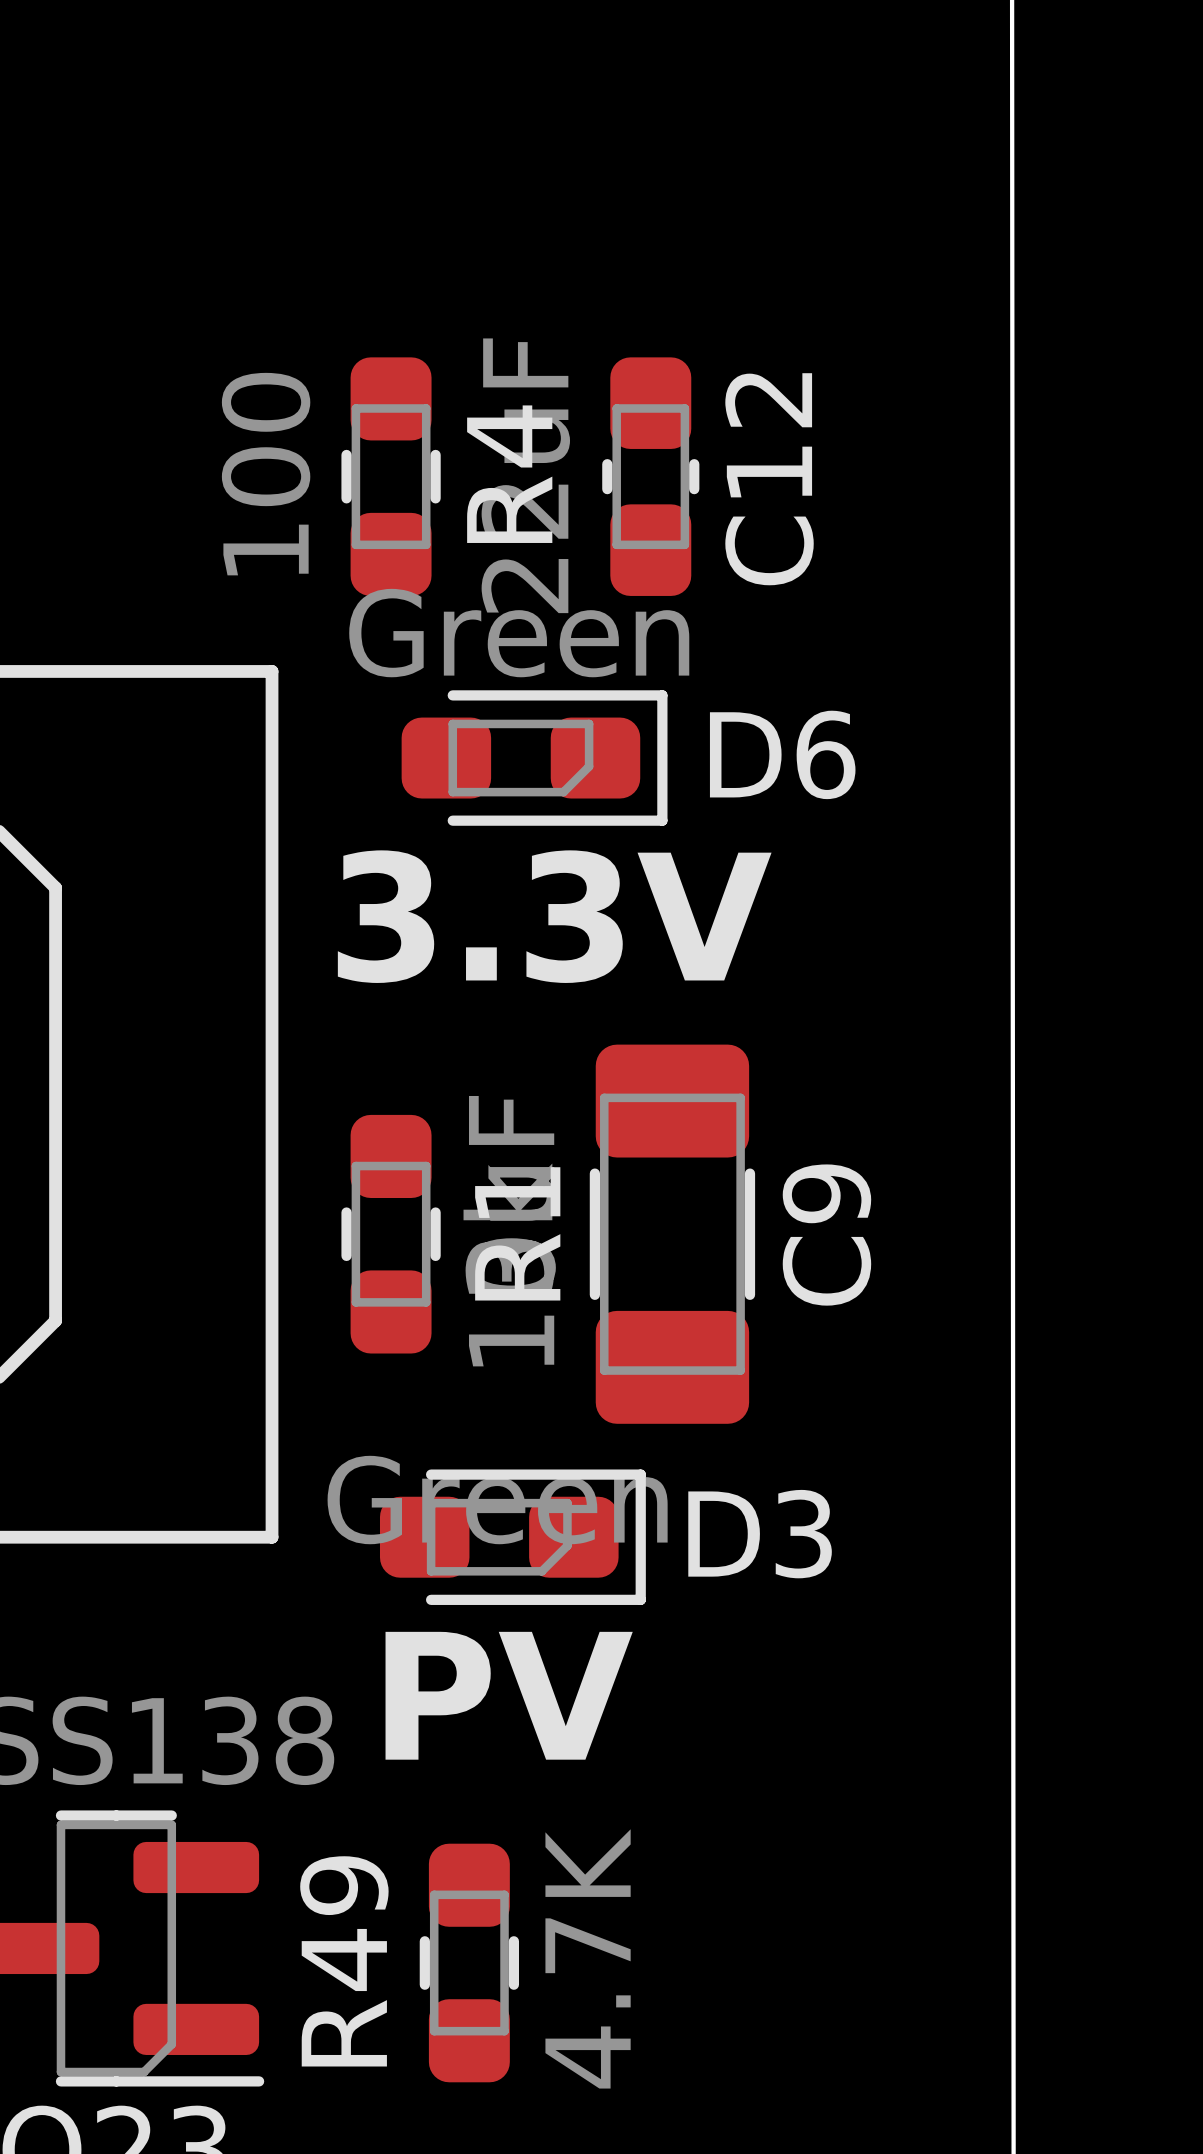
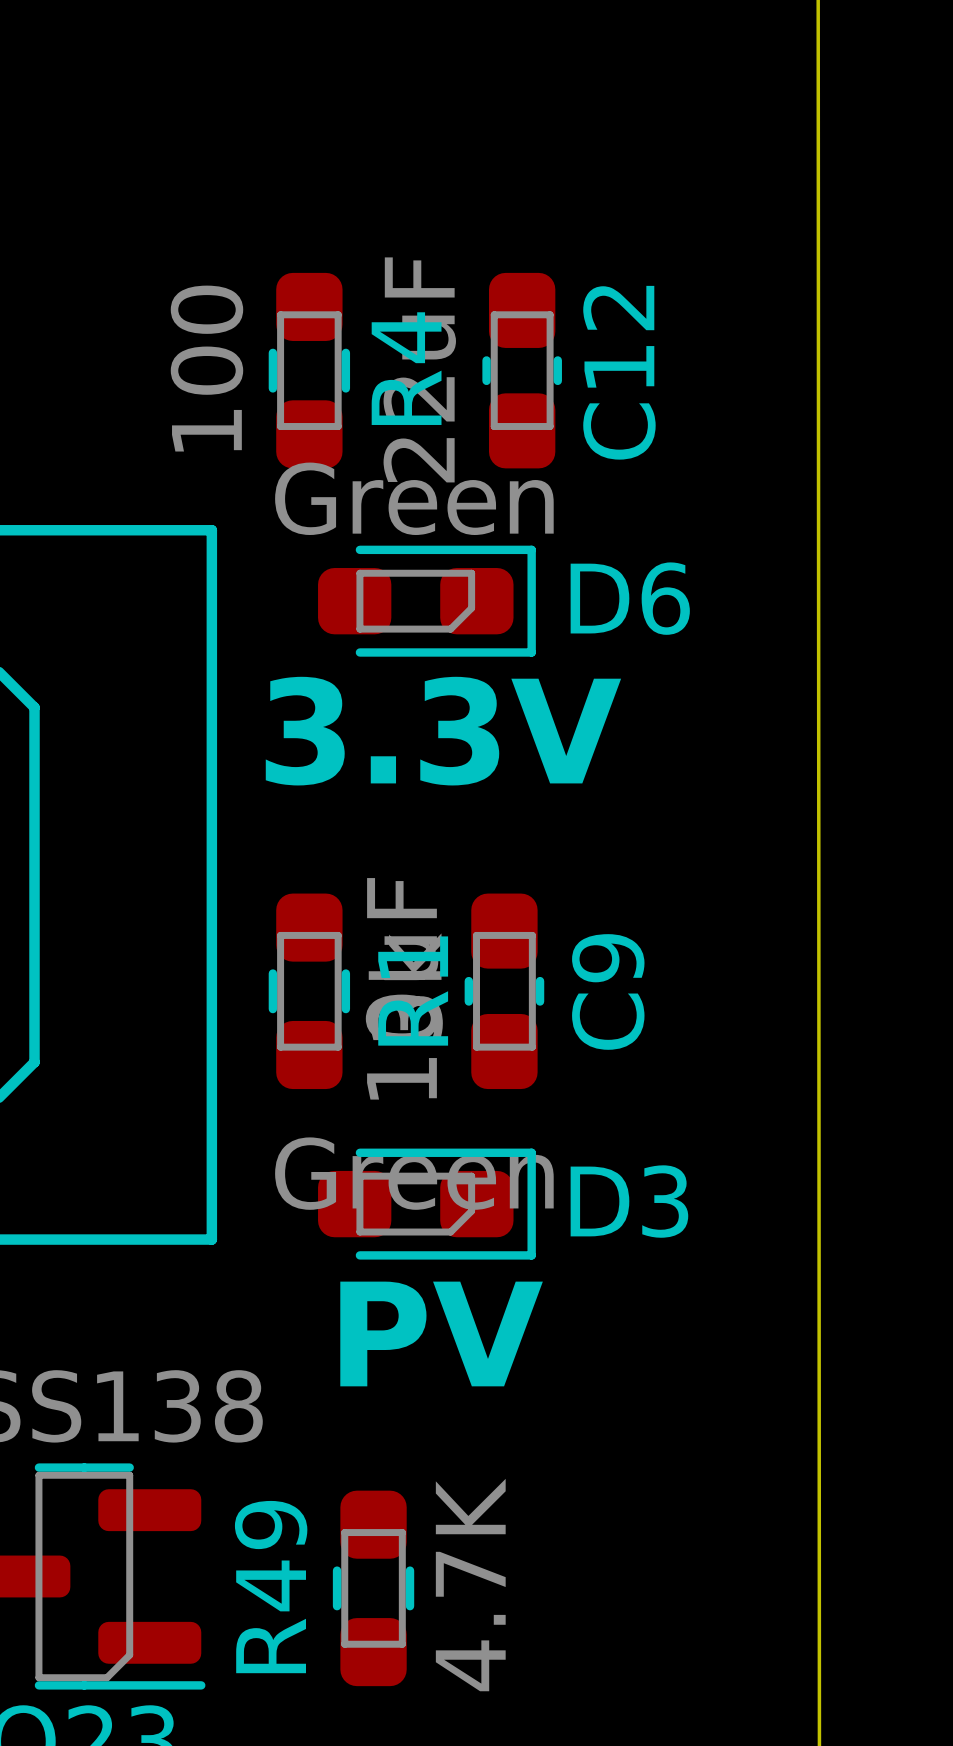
C9 footprint: [589, 1044, 756, 1424] -> [464, 893, 545, 1090]
D3 position: (512, 1537) -> (426, 1204)
text position: PV (509, 1695) -> PV (441, 1333)

